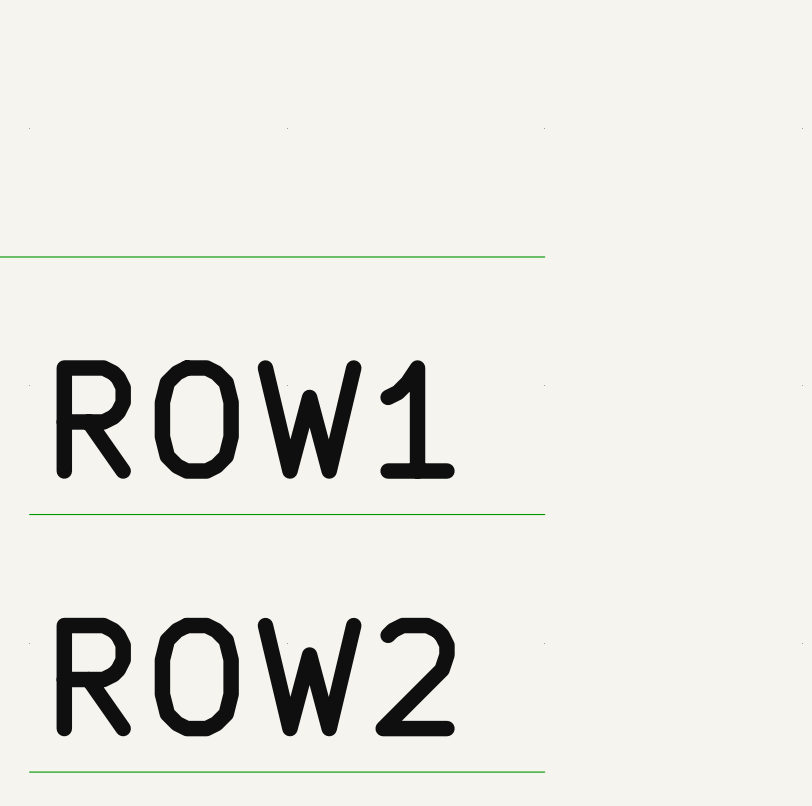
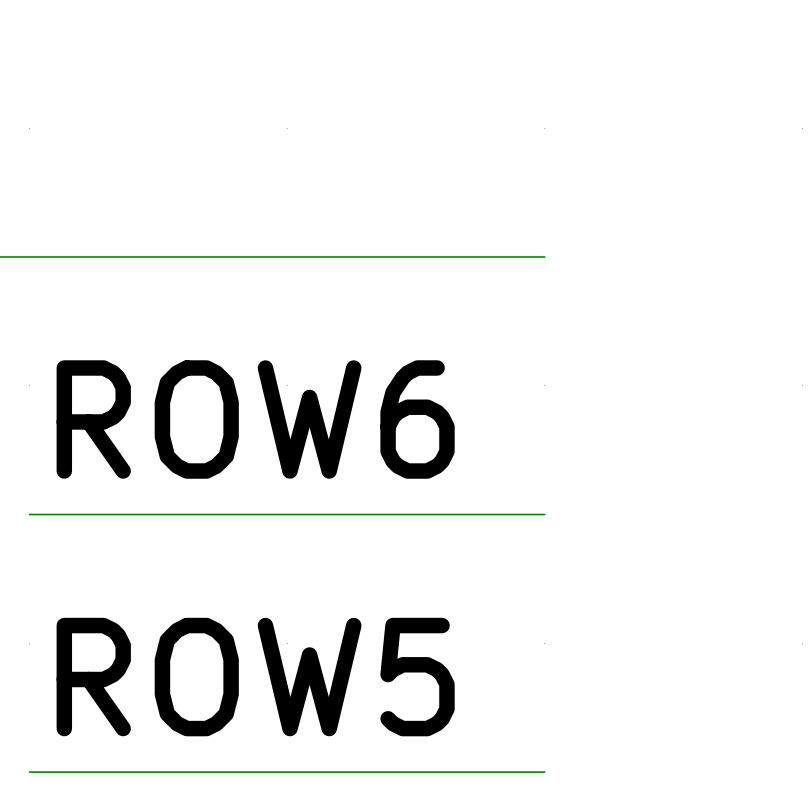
label: ROW1 (255, 419) -> ROW6 (255, 419)
label: ROW2 (255, 677) -> ROW5 (255, 677)

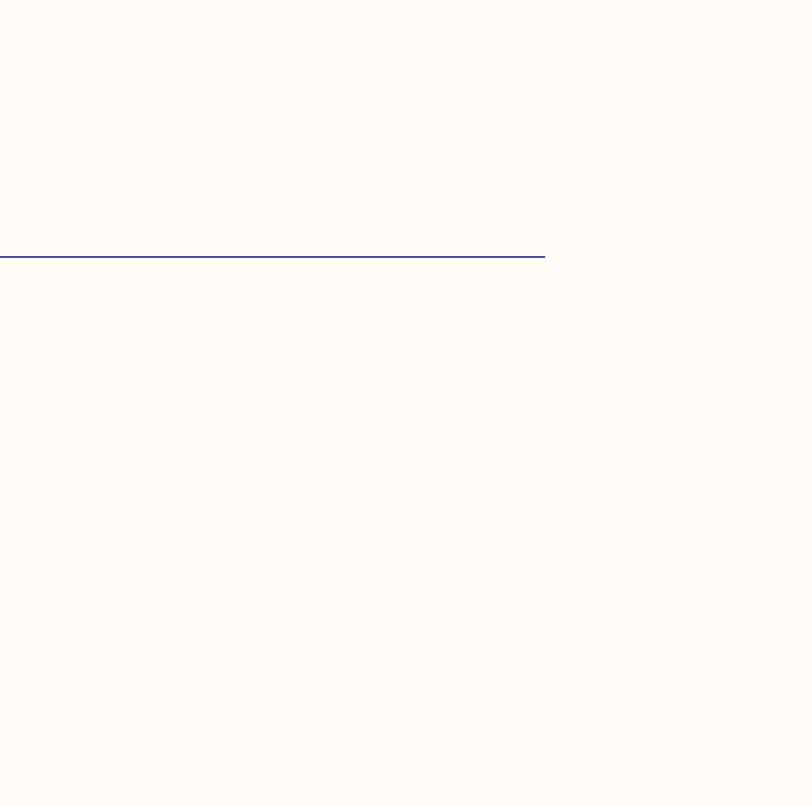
label: ROW6 (255, 419) -> none
wire: (29, 514) (544, 514) -> none
label: ROW5 (255, 677) -> none
wire: (29, 772) (544, 772) -> none

